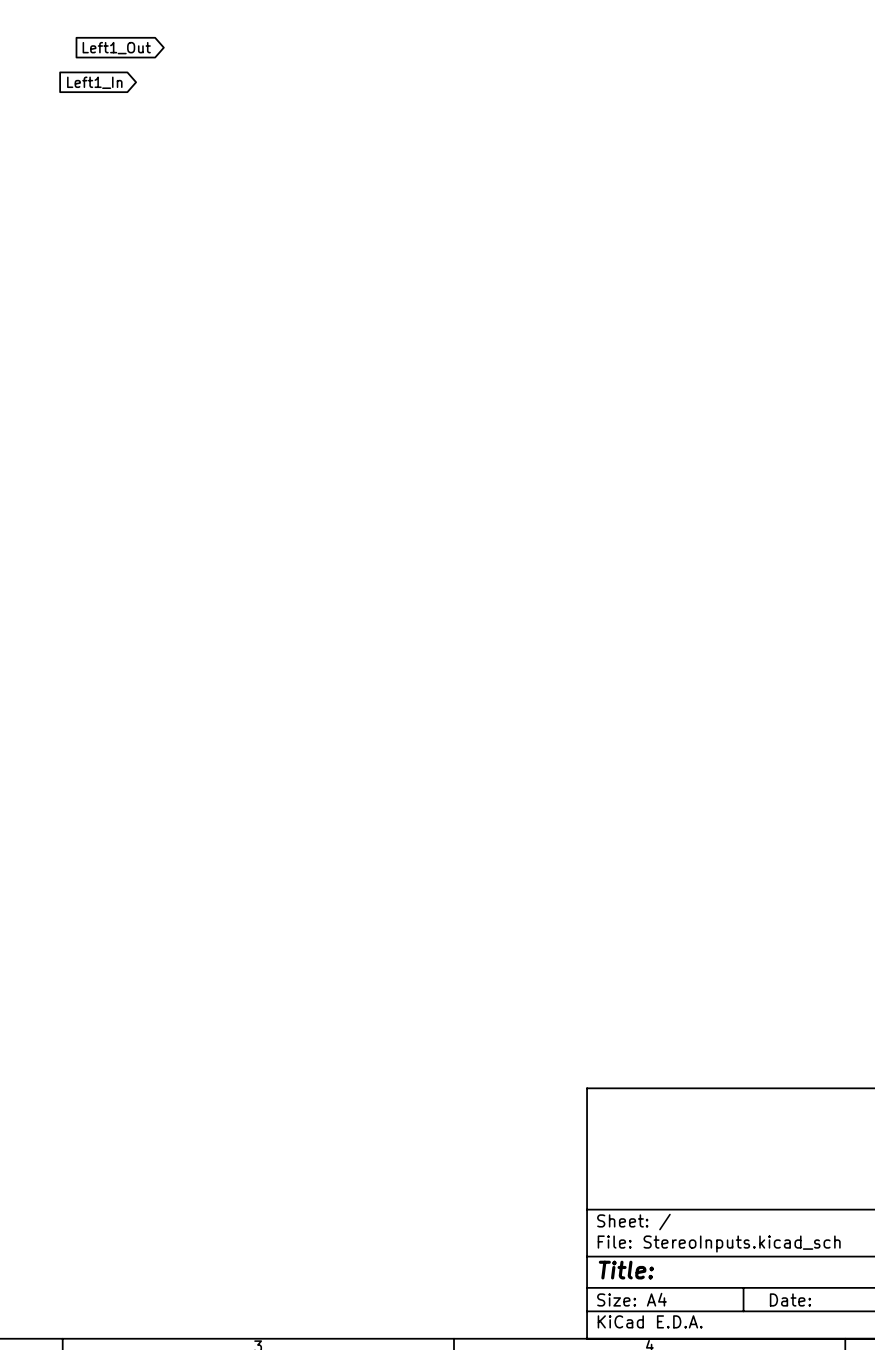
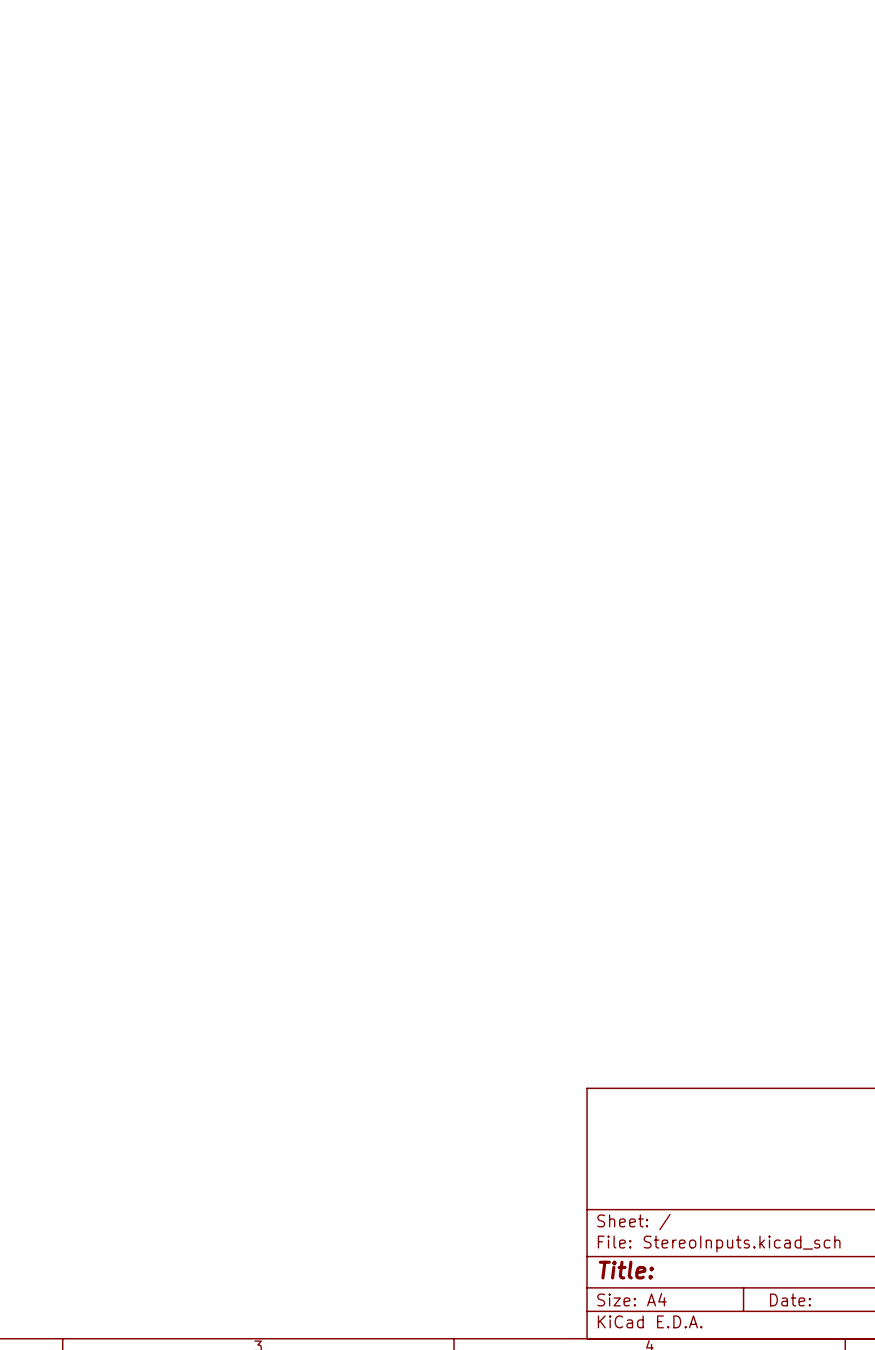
global label: Left1_Out (116, 48) -> none
global label: Left1_In (94, 82) -> none

